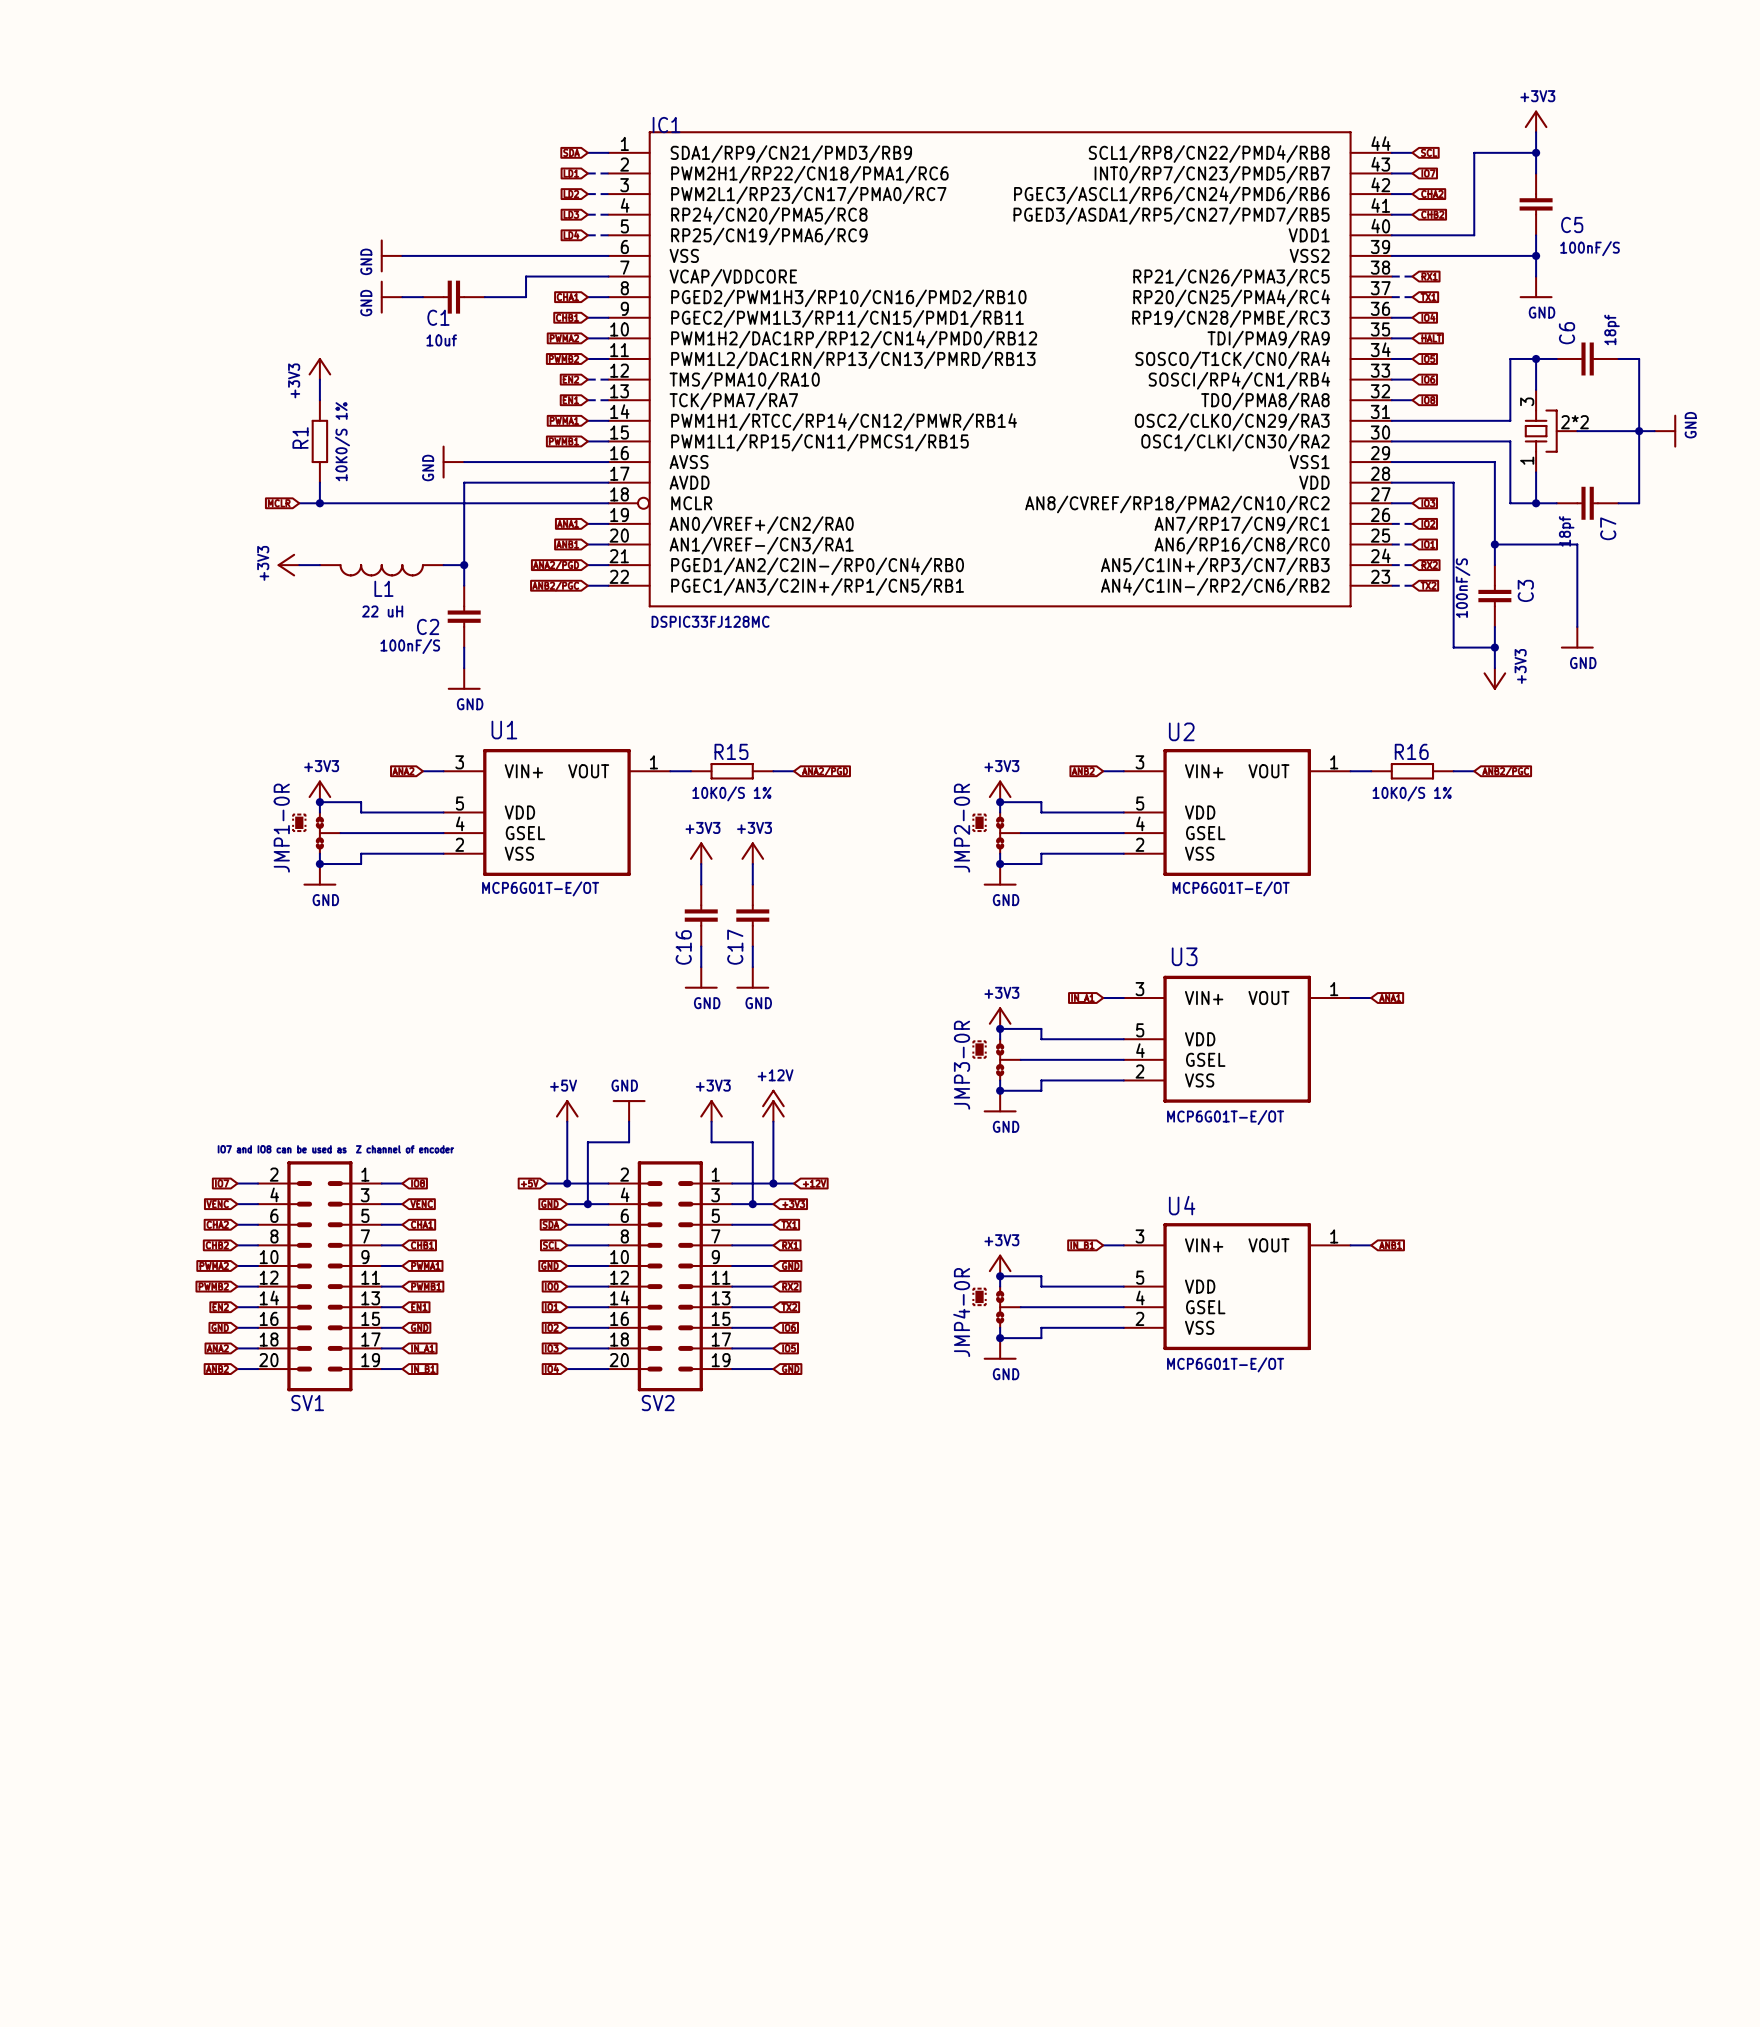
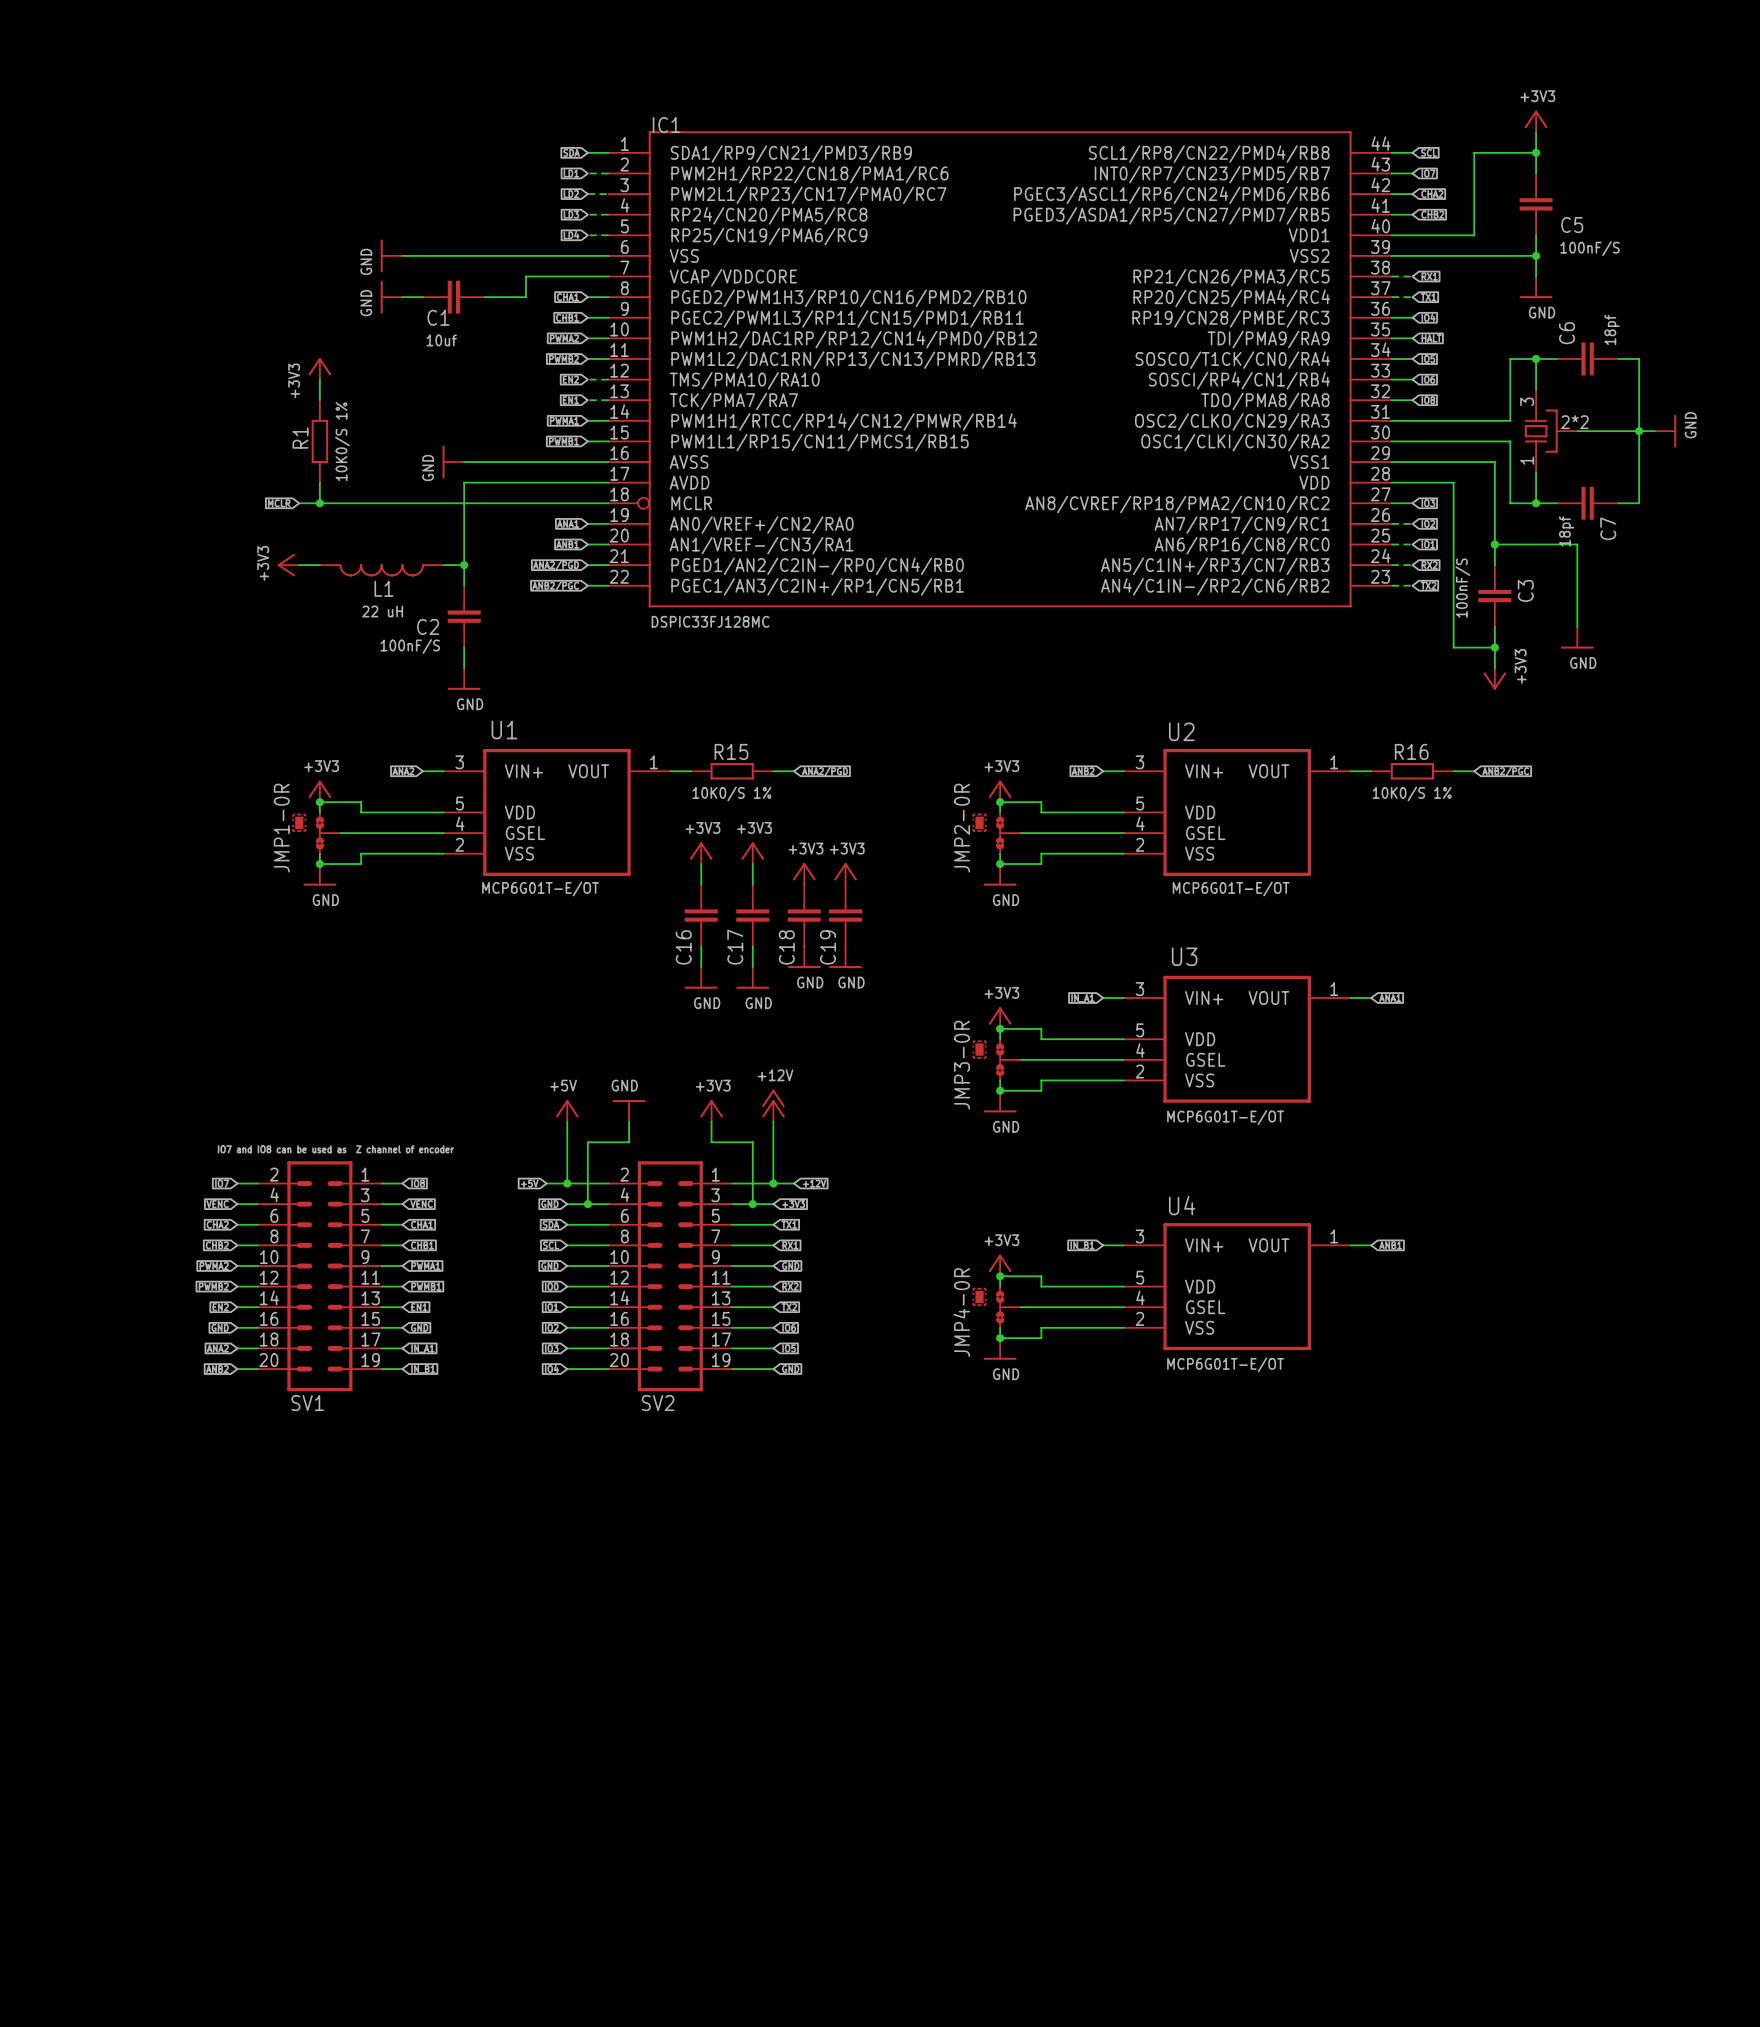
power symbol: none -> +3V3 (804, 873)
power symbol: none -> +3V3 (845, 873)
C18: none -> (804, 915)
C19: none -> (845, 915)
power symbol: none -> GND (804, 957)
power symbol: none -> GND (845, 957)

